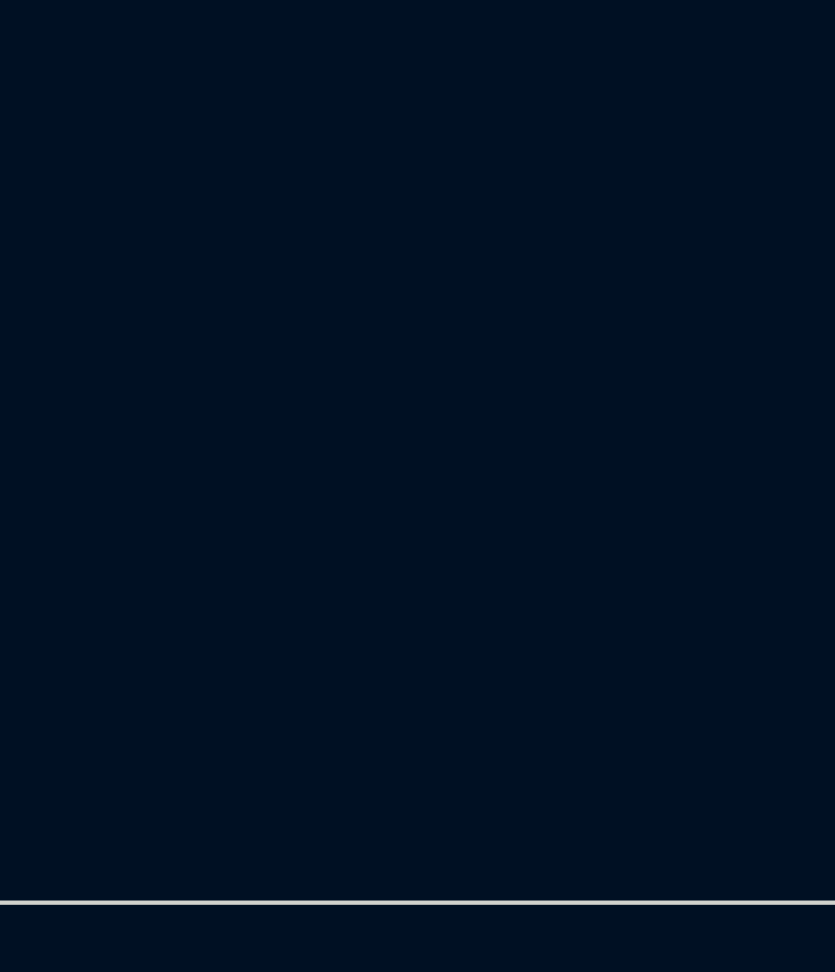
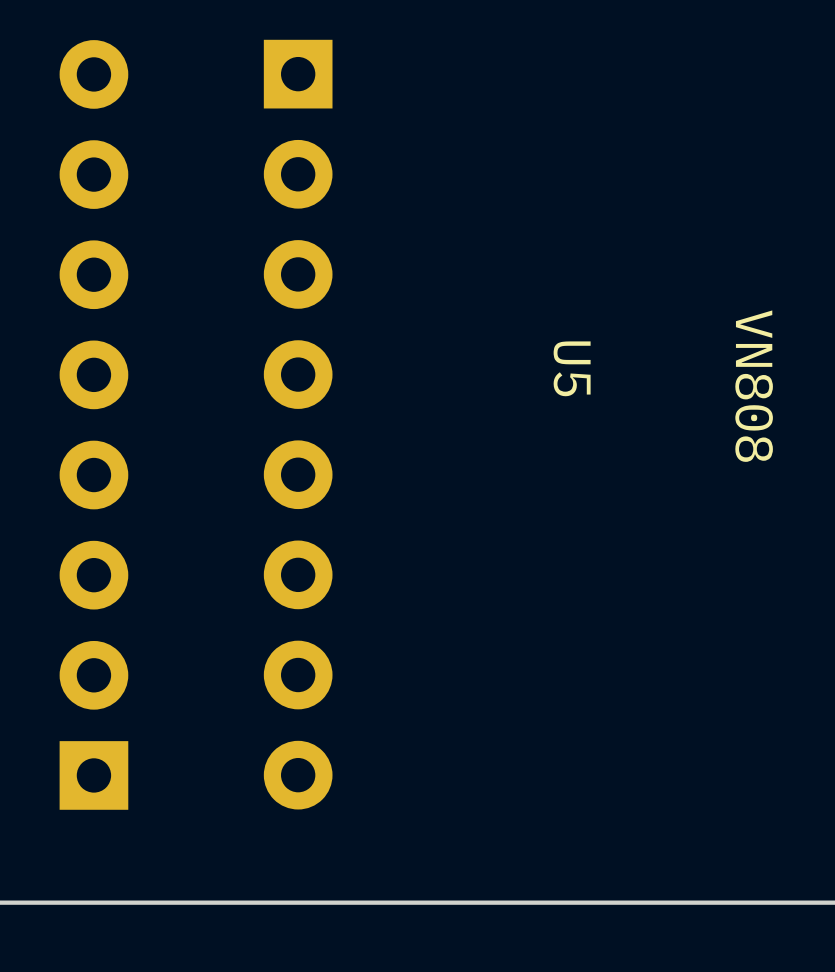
U5: none -> VN808 (663, 386)
part: none -> (93, 424)
part: none -> (298, 424)

